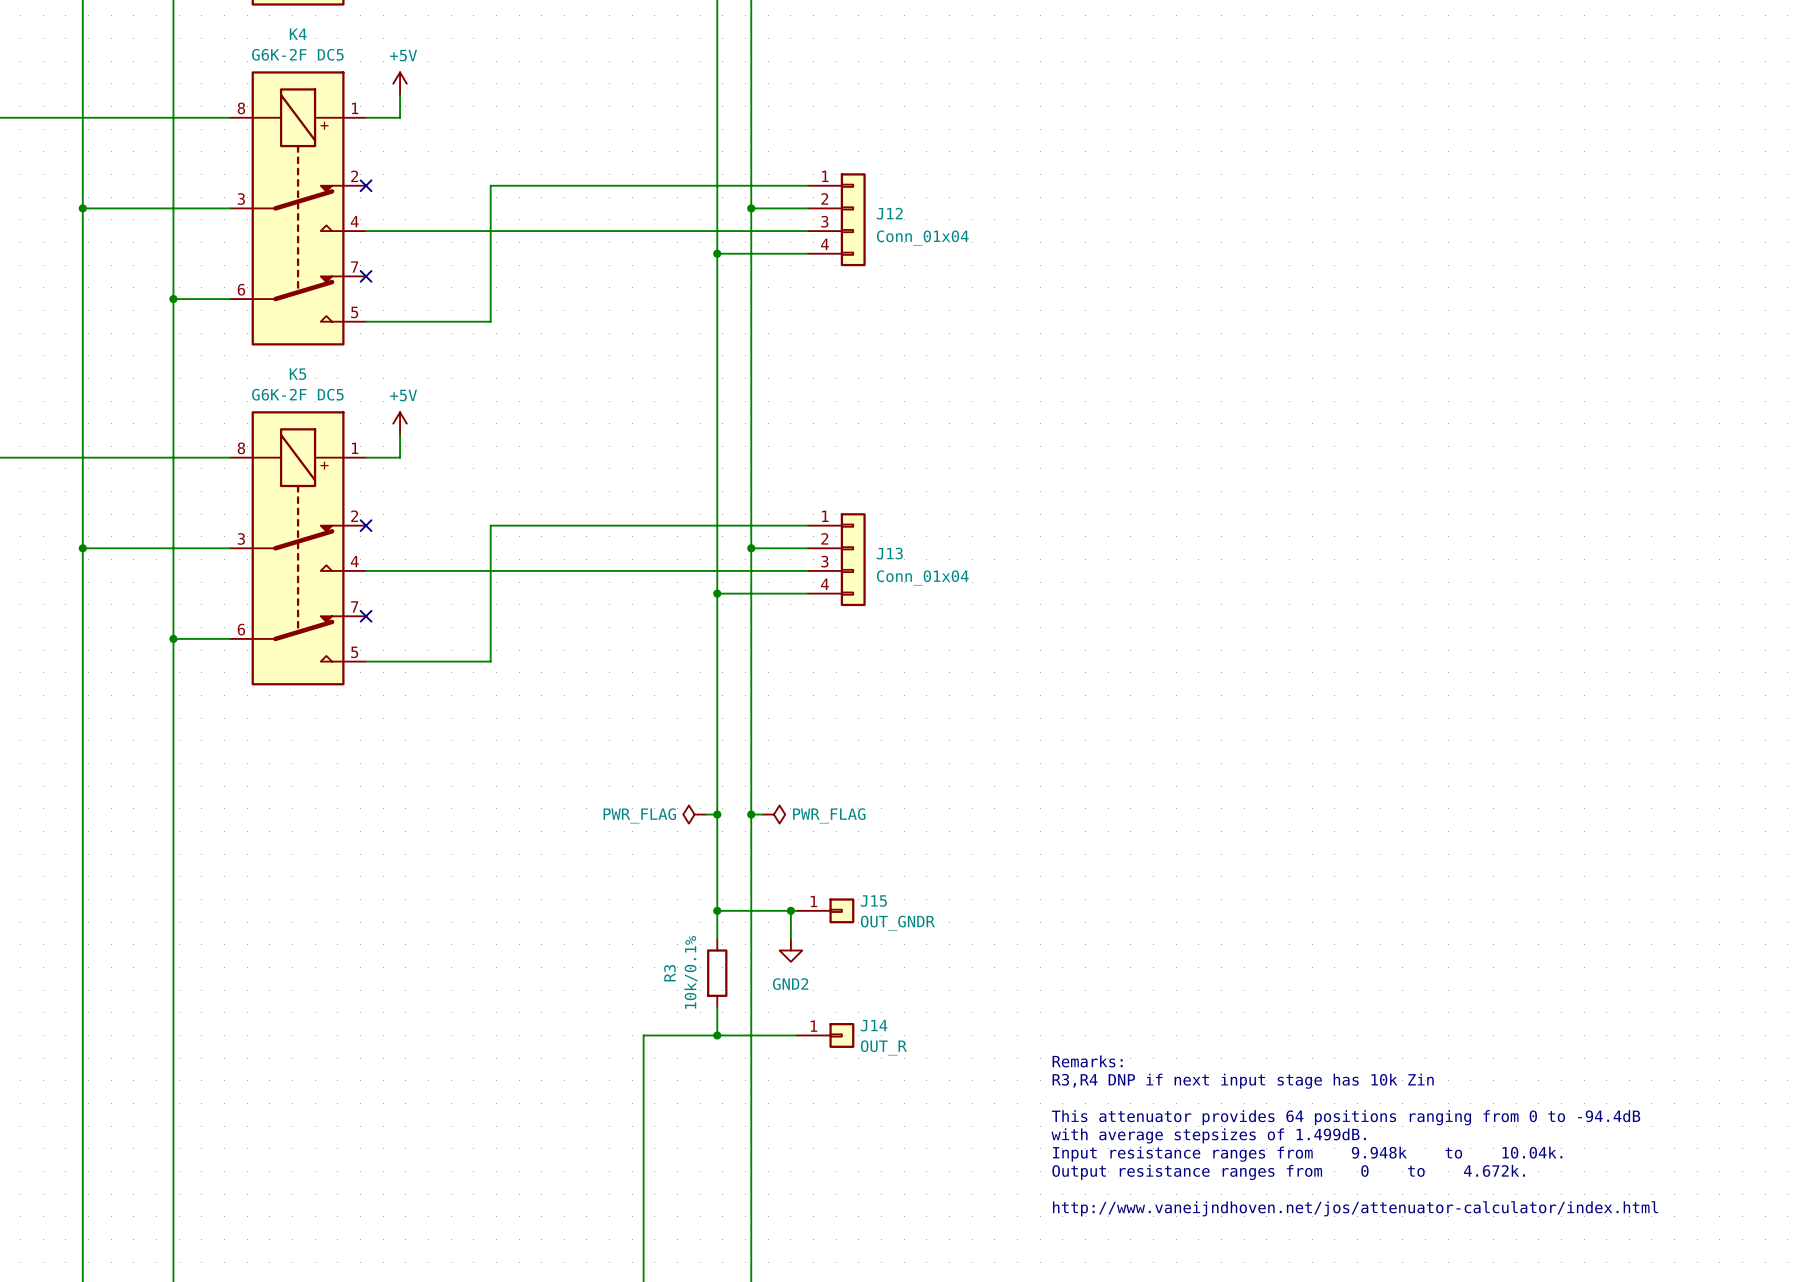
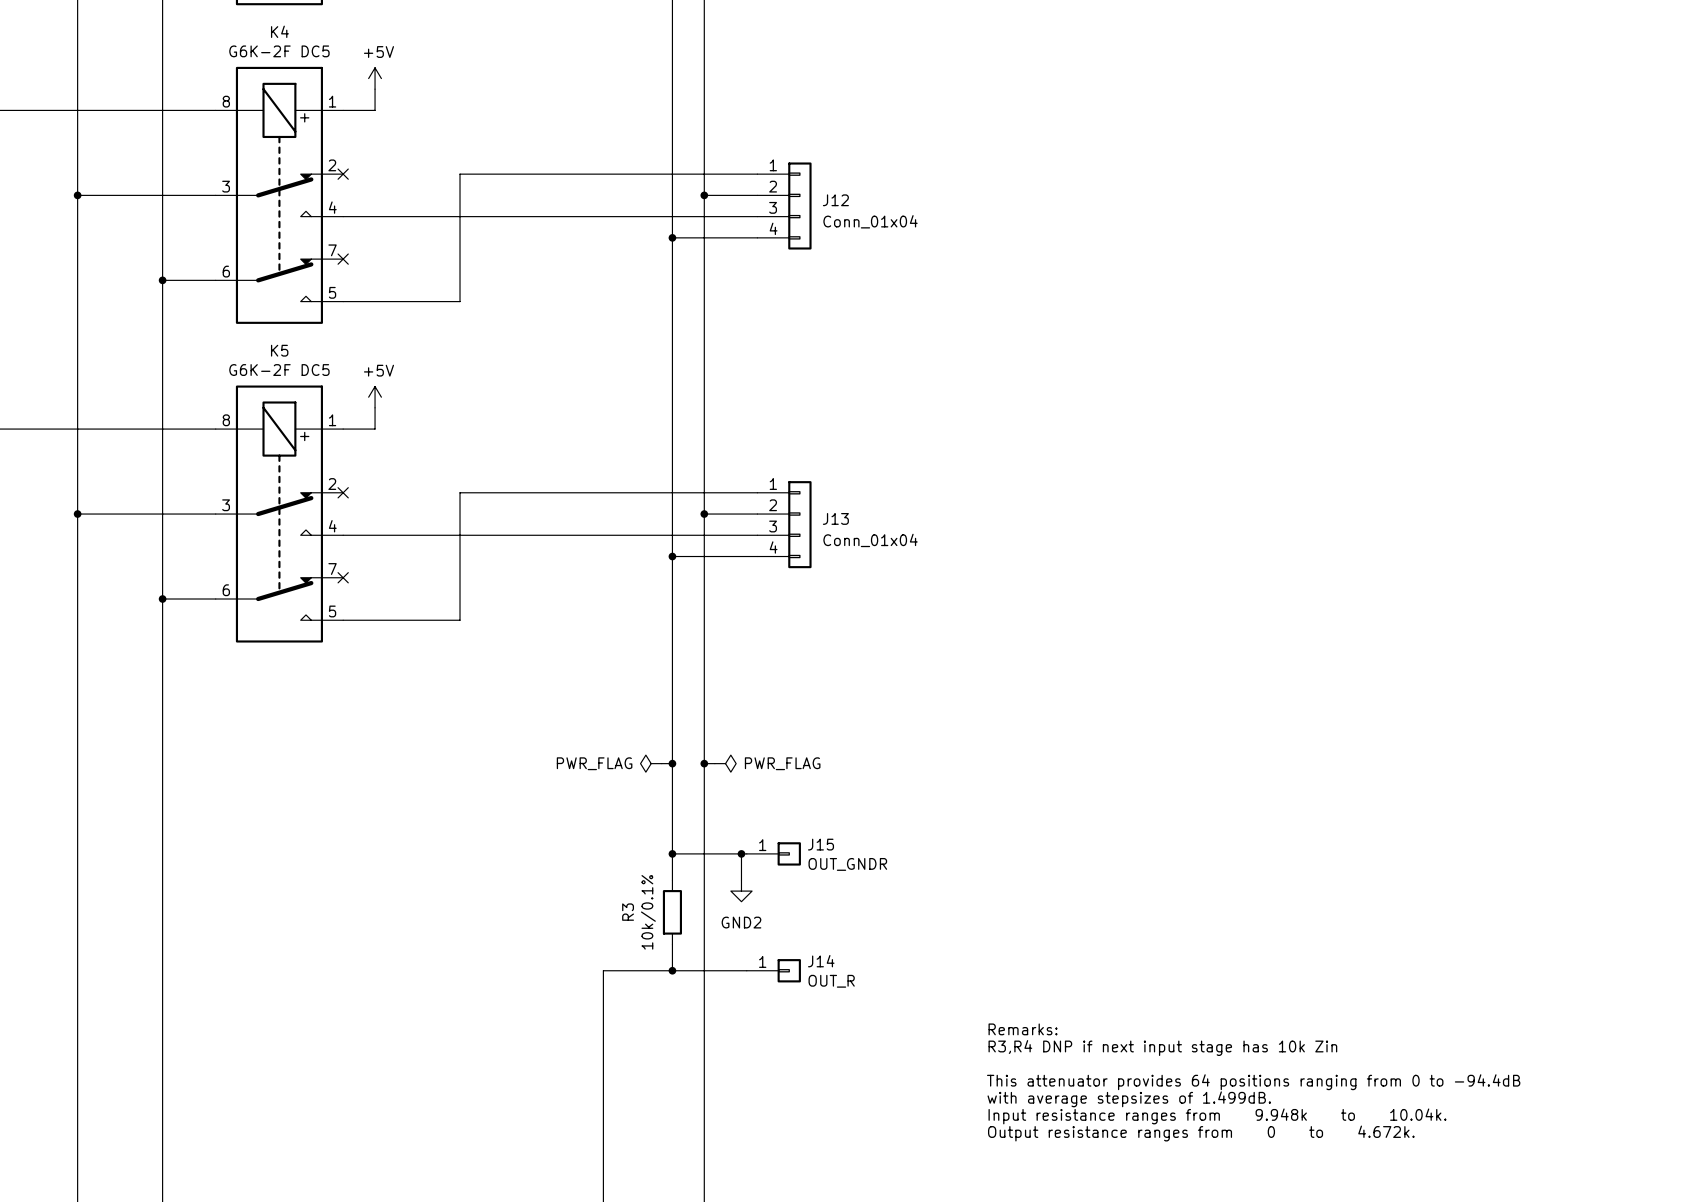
text position: Remarks: (1087, 1061) -> Remarks: (1023, 1029)
text: R3,R4 DNP if next input stage has 10k Zin (1243, 1081) -> none
text: This attenuator provides 64 positions ranging from 0 to -94.4dB (1346, 1117) -> R3,R4 DNP if next input stage has 10k Zin (1162, 1048)
text: with average stepsizes of 1.499dB. (1208, 1135) -> none
text: Input resistance ranges from 9.948k to 10.04k. (1307, 1154) -> This attenuator provides 64 positions ranging from 0 to -94.4dB (1253, 1082)
text: Output resistance ranges from 0 to 4.672k. (1288, 1172) -> with average stepsizes of 1.499dB. (1129, 1099)
text: none -> Input resistance ranges from 9.948k to 10.04k. (1217, 1116)
text: http://www.vaneijndhoven.net/jos/attenuator-calculator/index.html (1355, 1208) -> Output resistance ranges from 0 to 4.672k. (1201, 1133)

